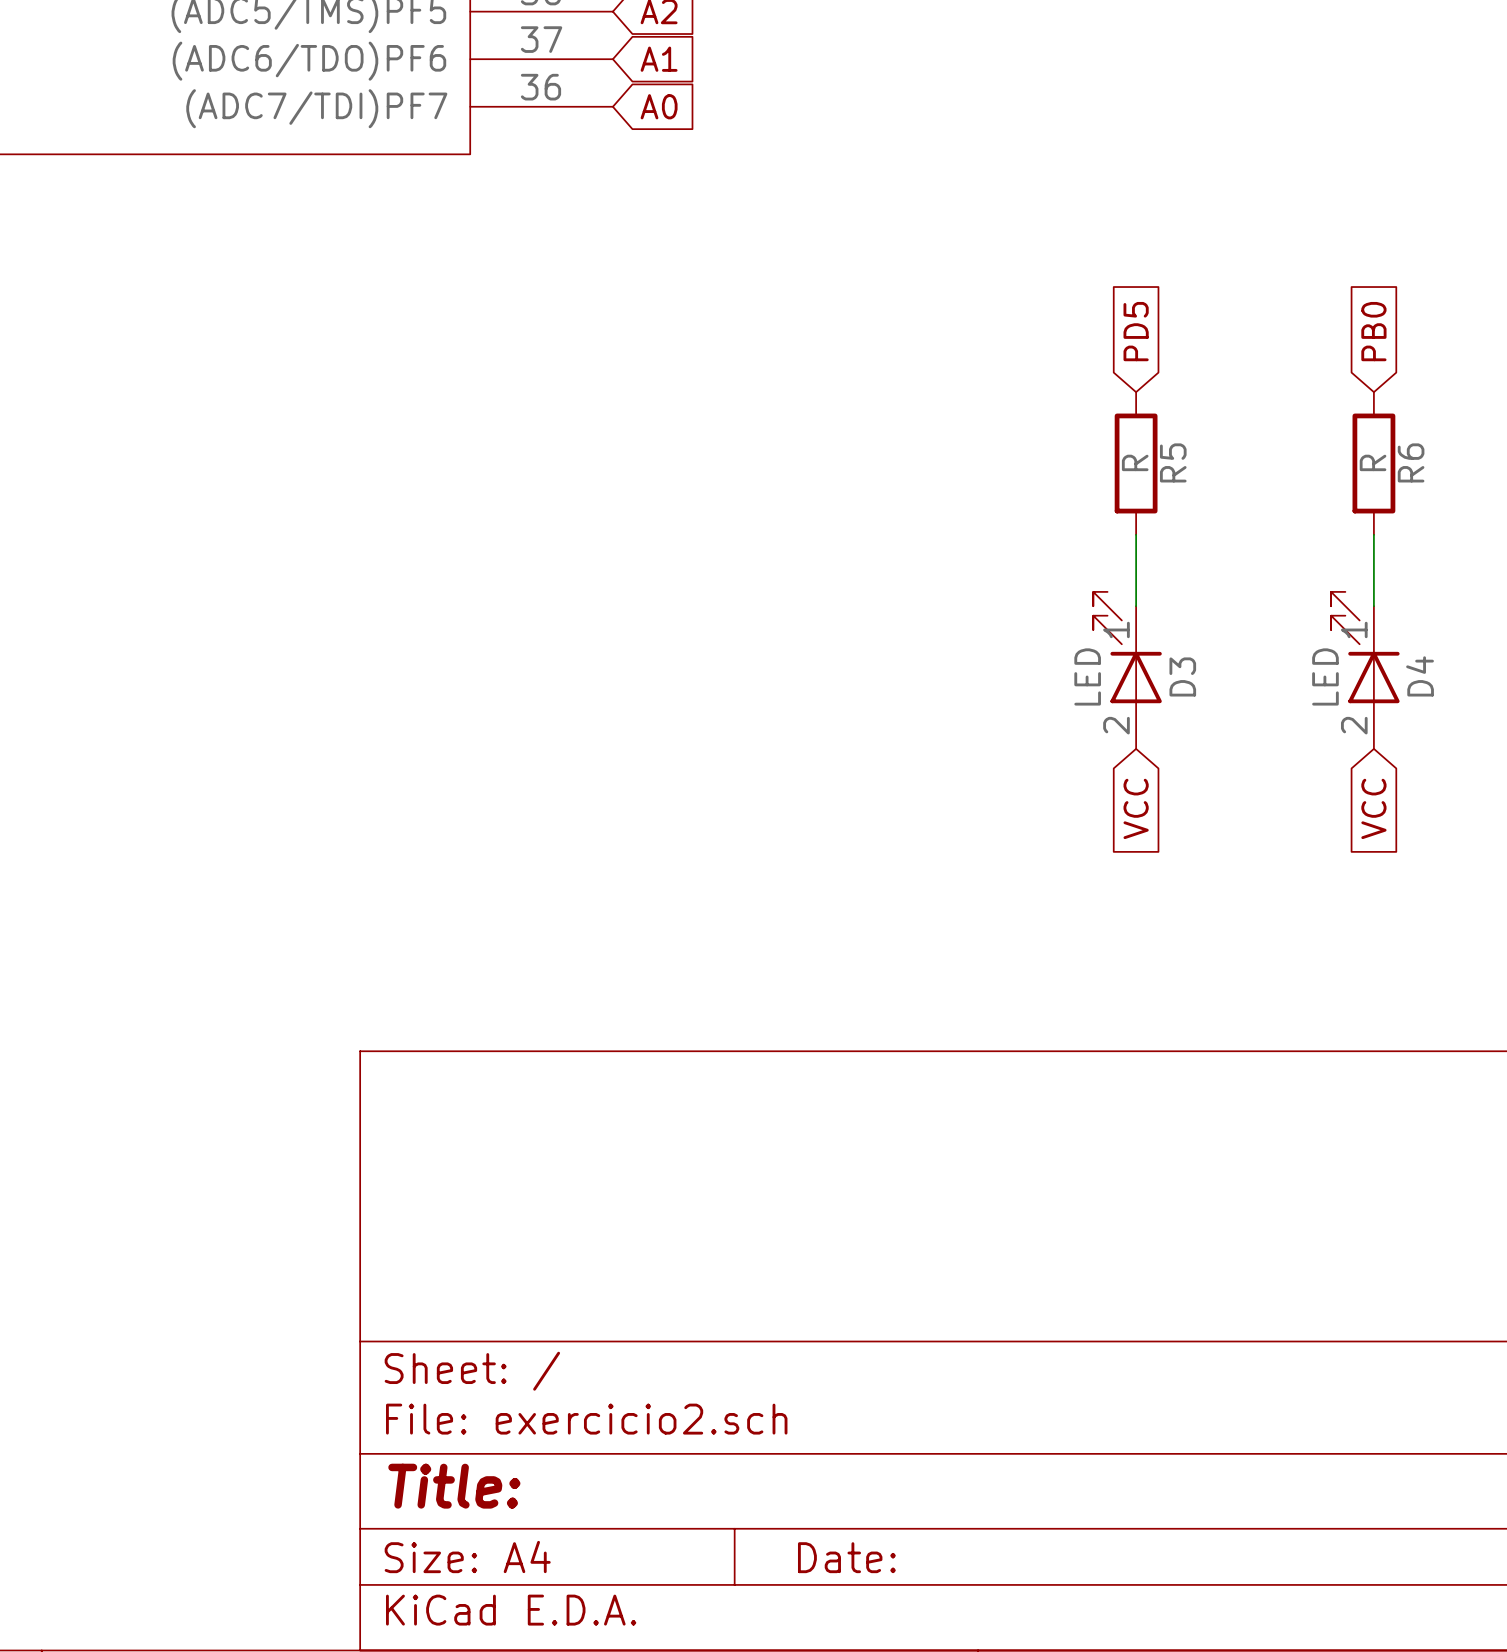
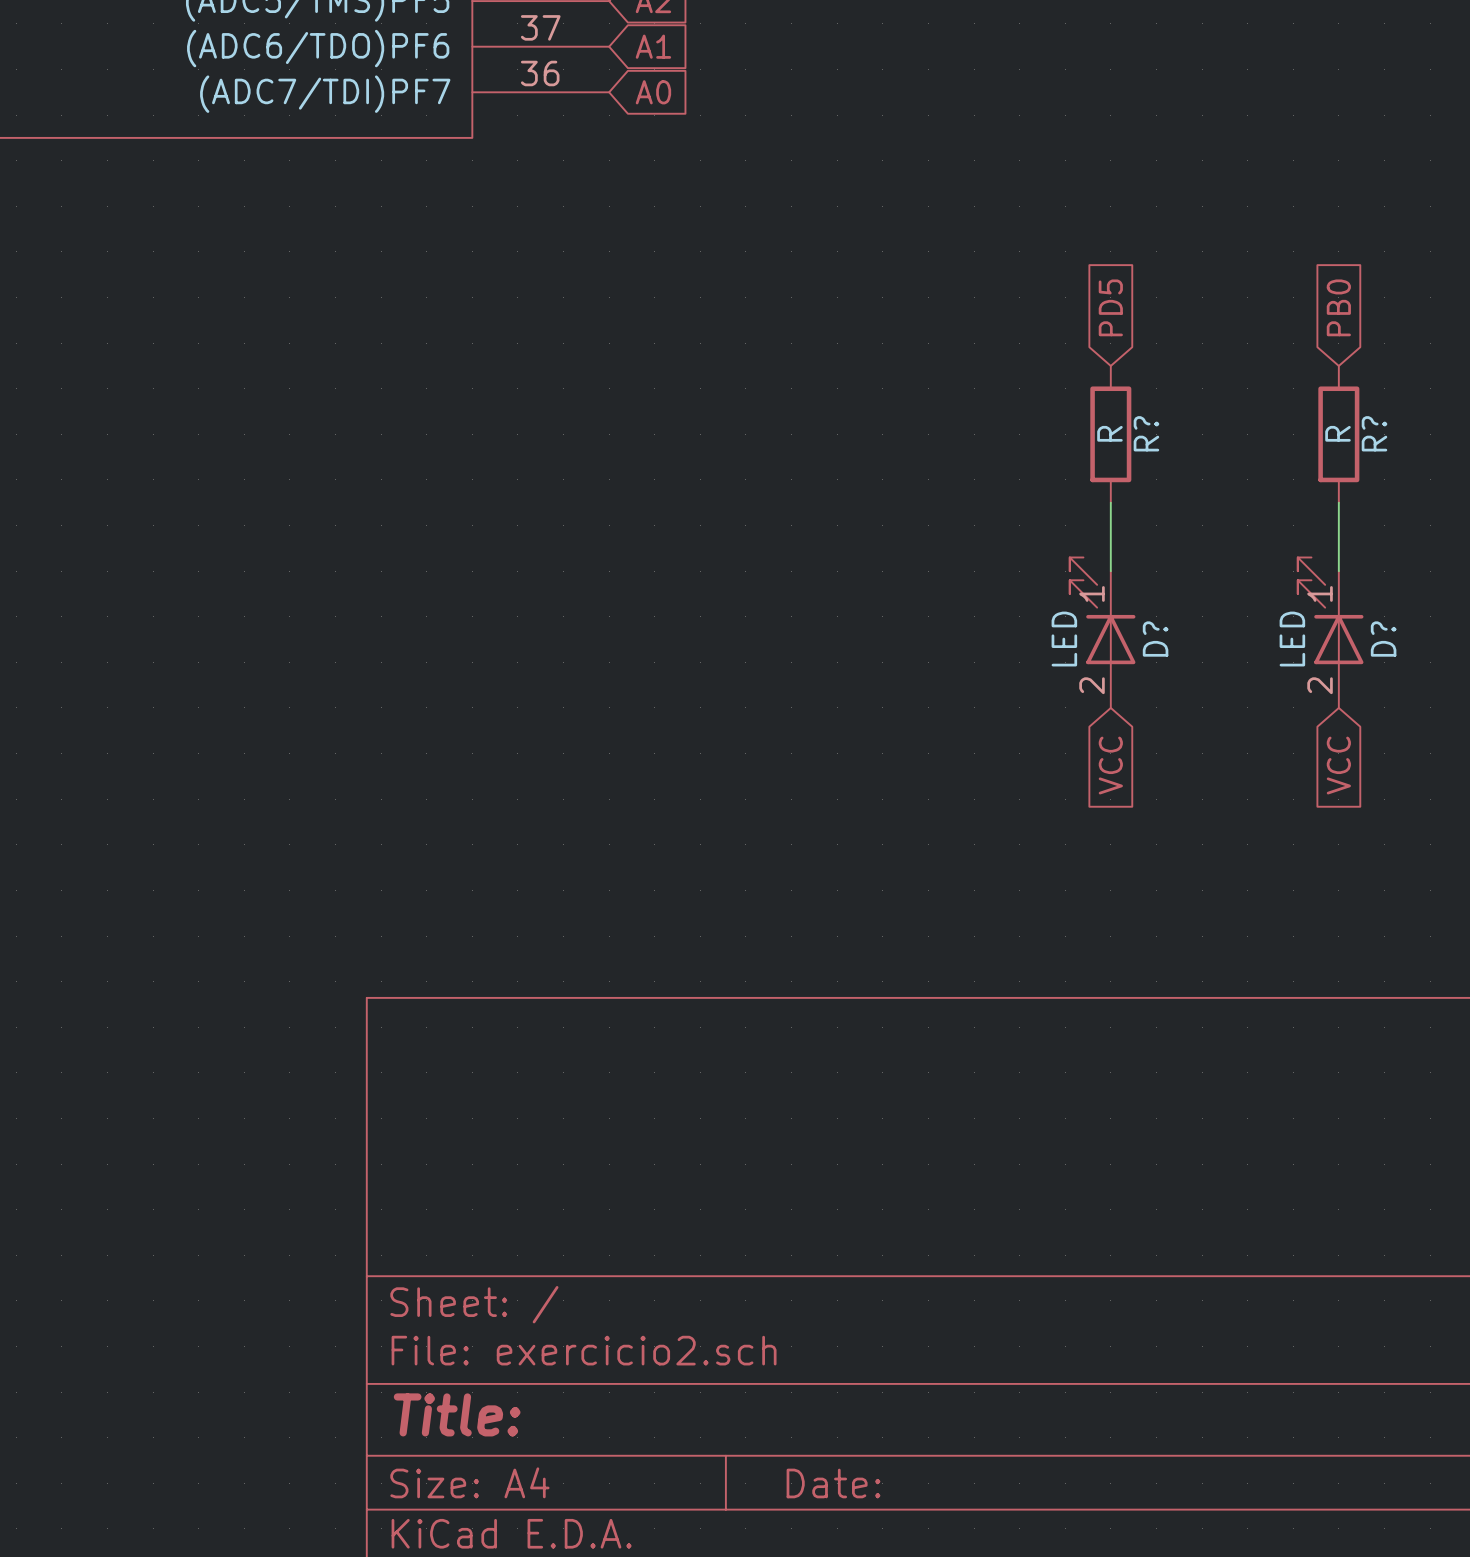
R5 name: R5 (1173, 462) -> R? (1146, 433)
R6 name: R6 (1411, 462) -> R? (1374, 433)
D3 name: D3 (1182, 676) -> D? (1155, 639)
D4 name: D4 (1420, 676) -> D? (1383, 639)

